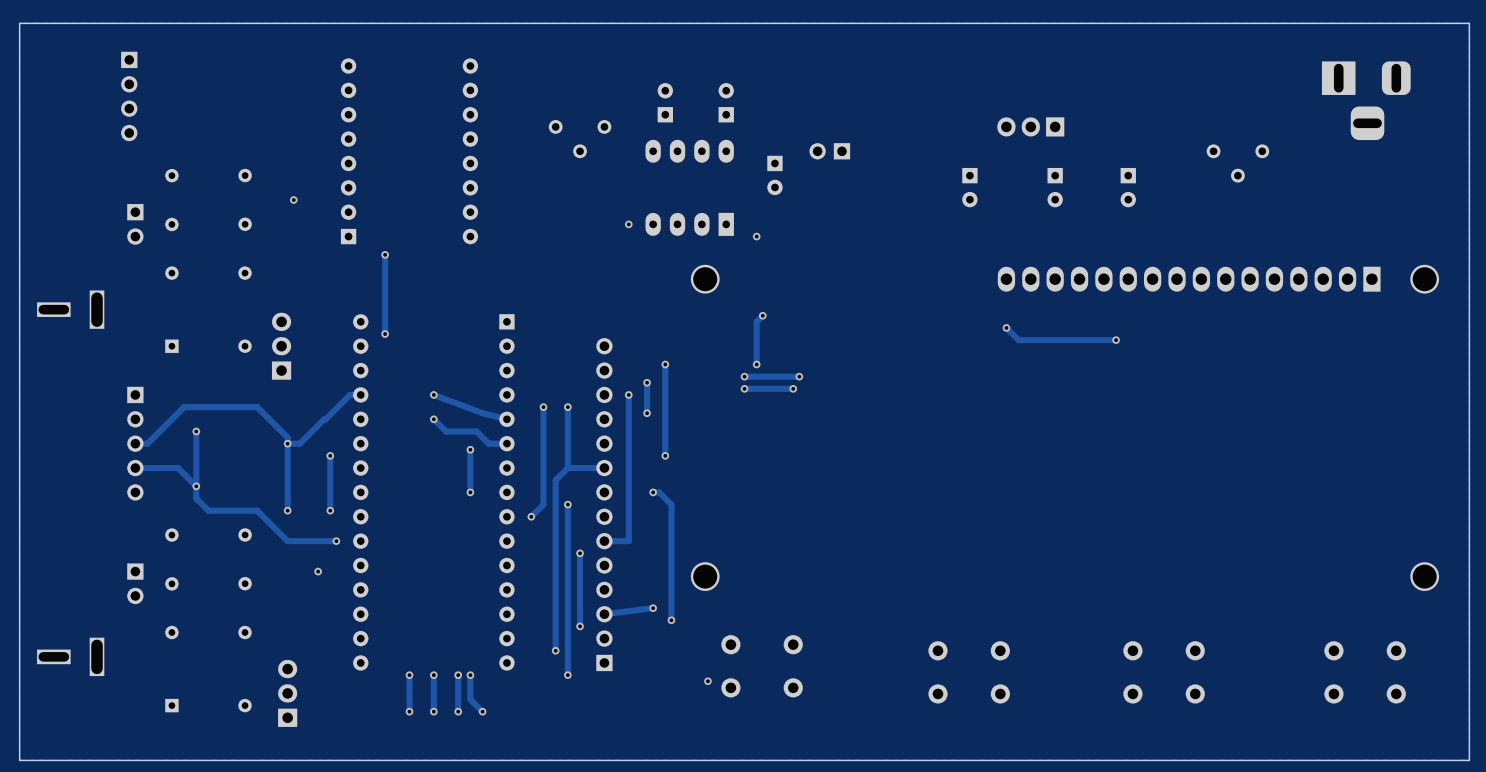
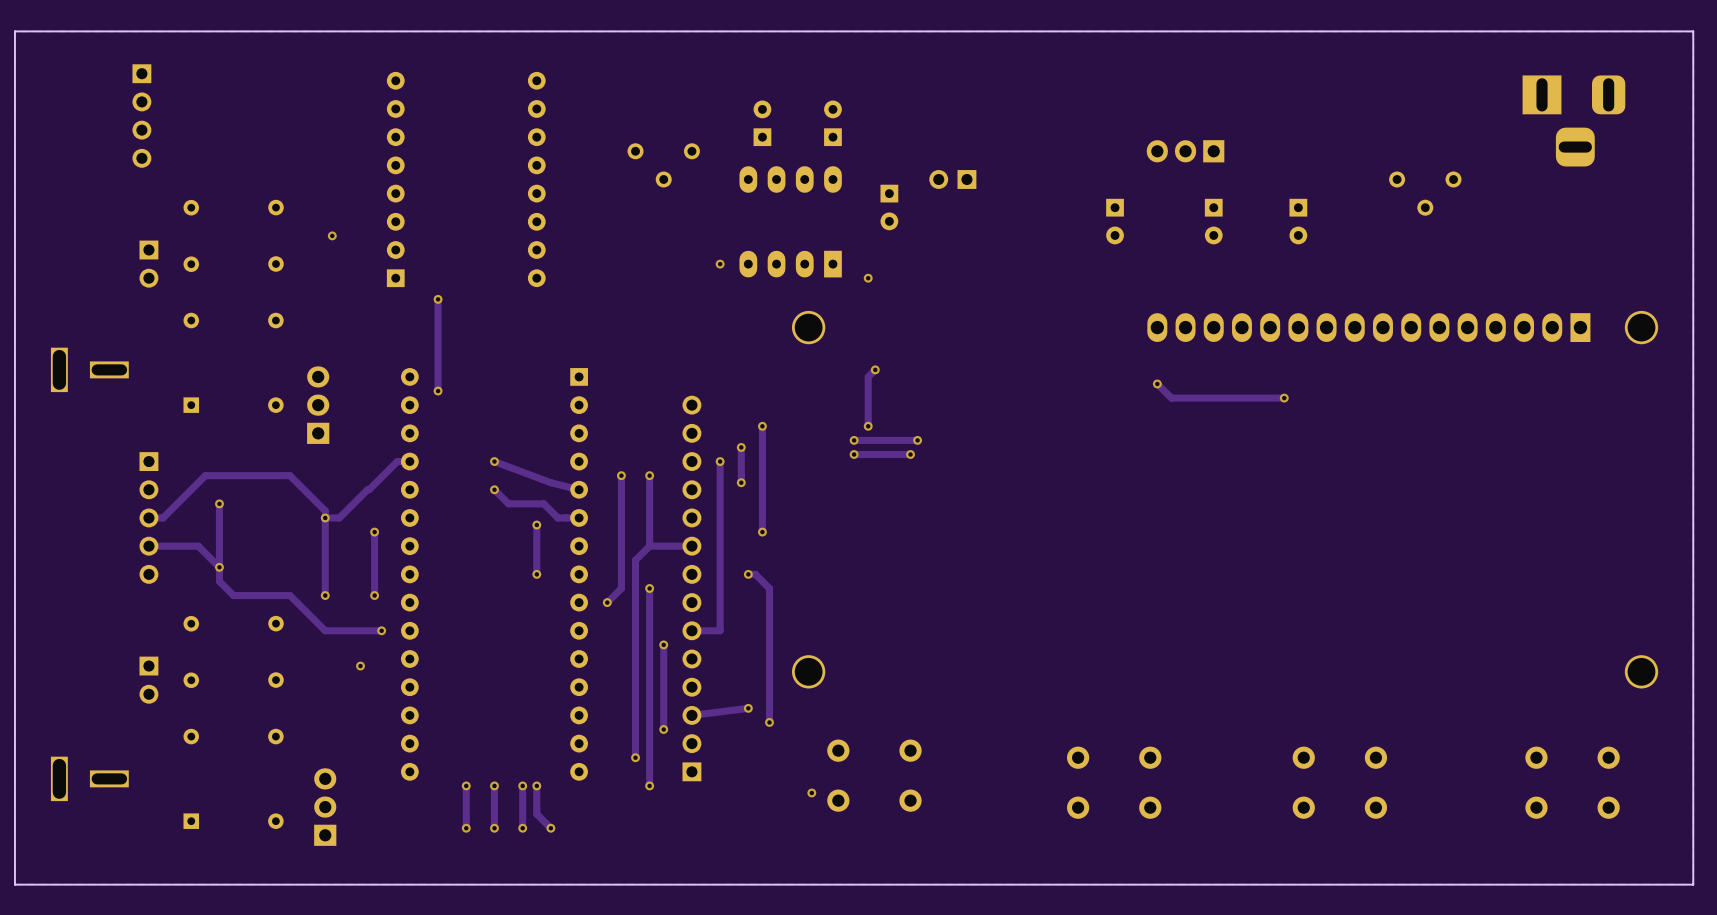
part rotation: 0° (70, 309) -> 180° (89, 369)
part rotation: 0° (70, 656) -> 180° (89, 778)

